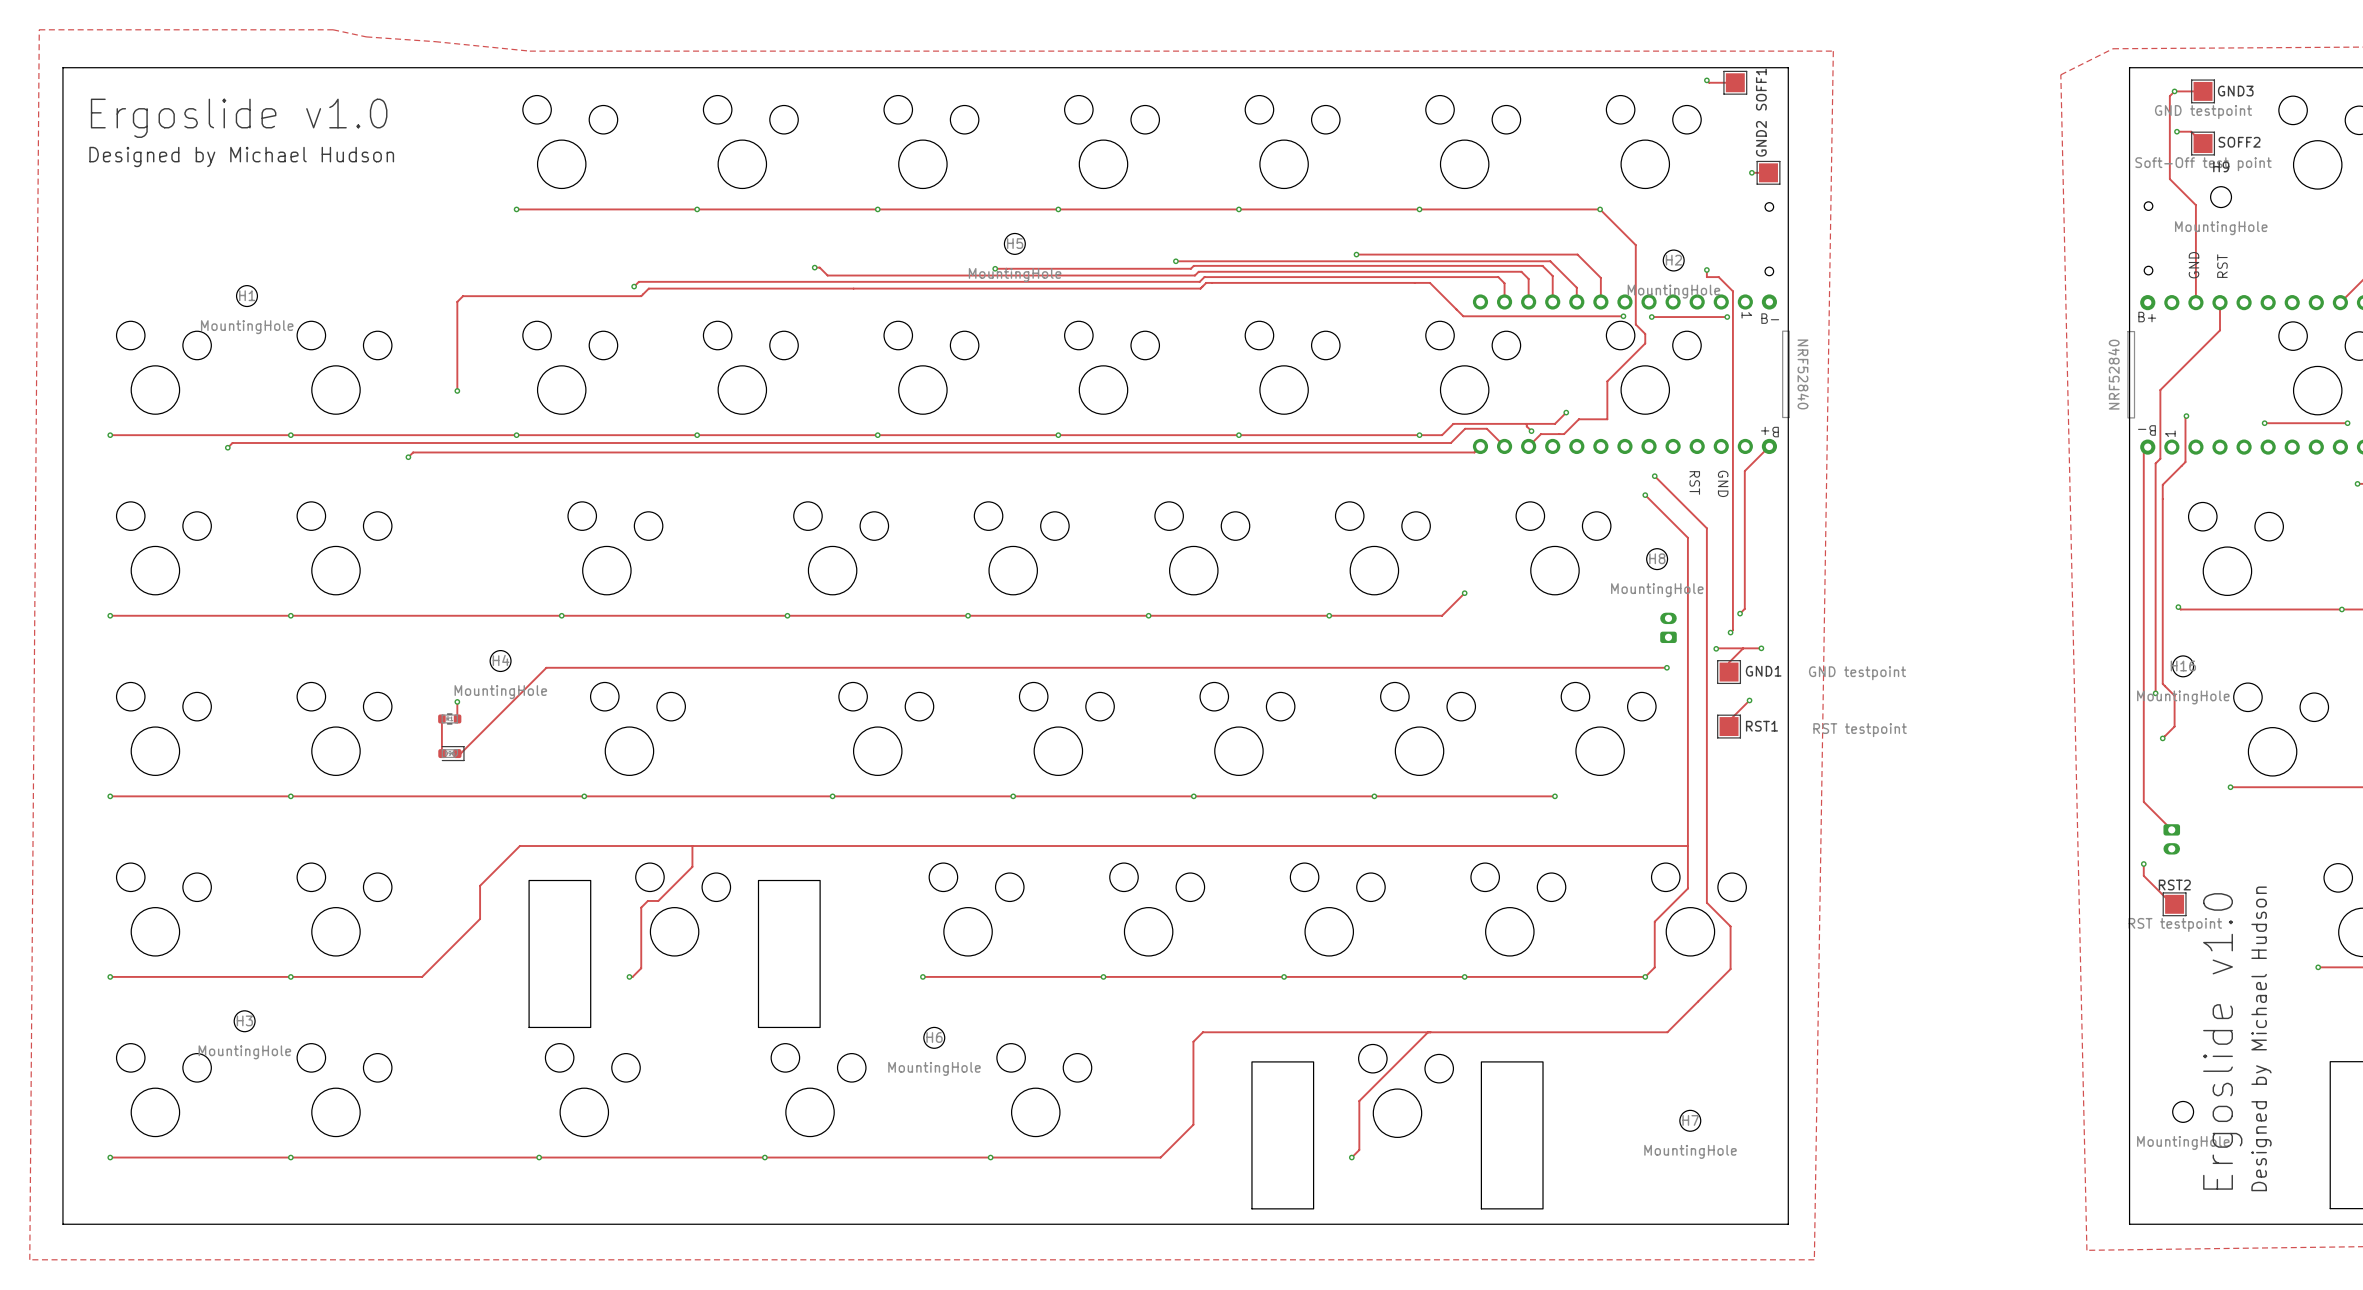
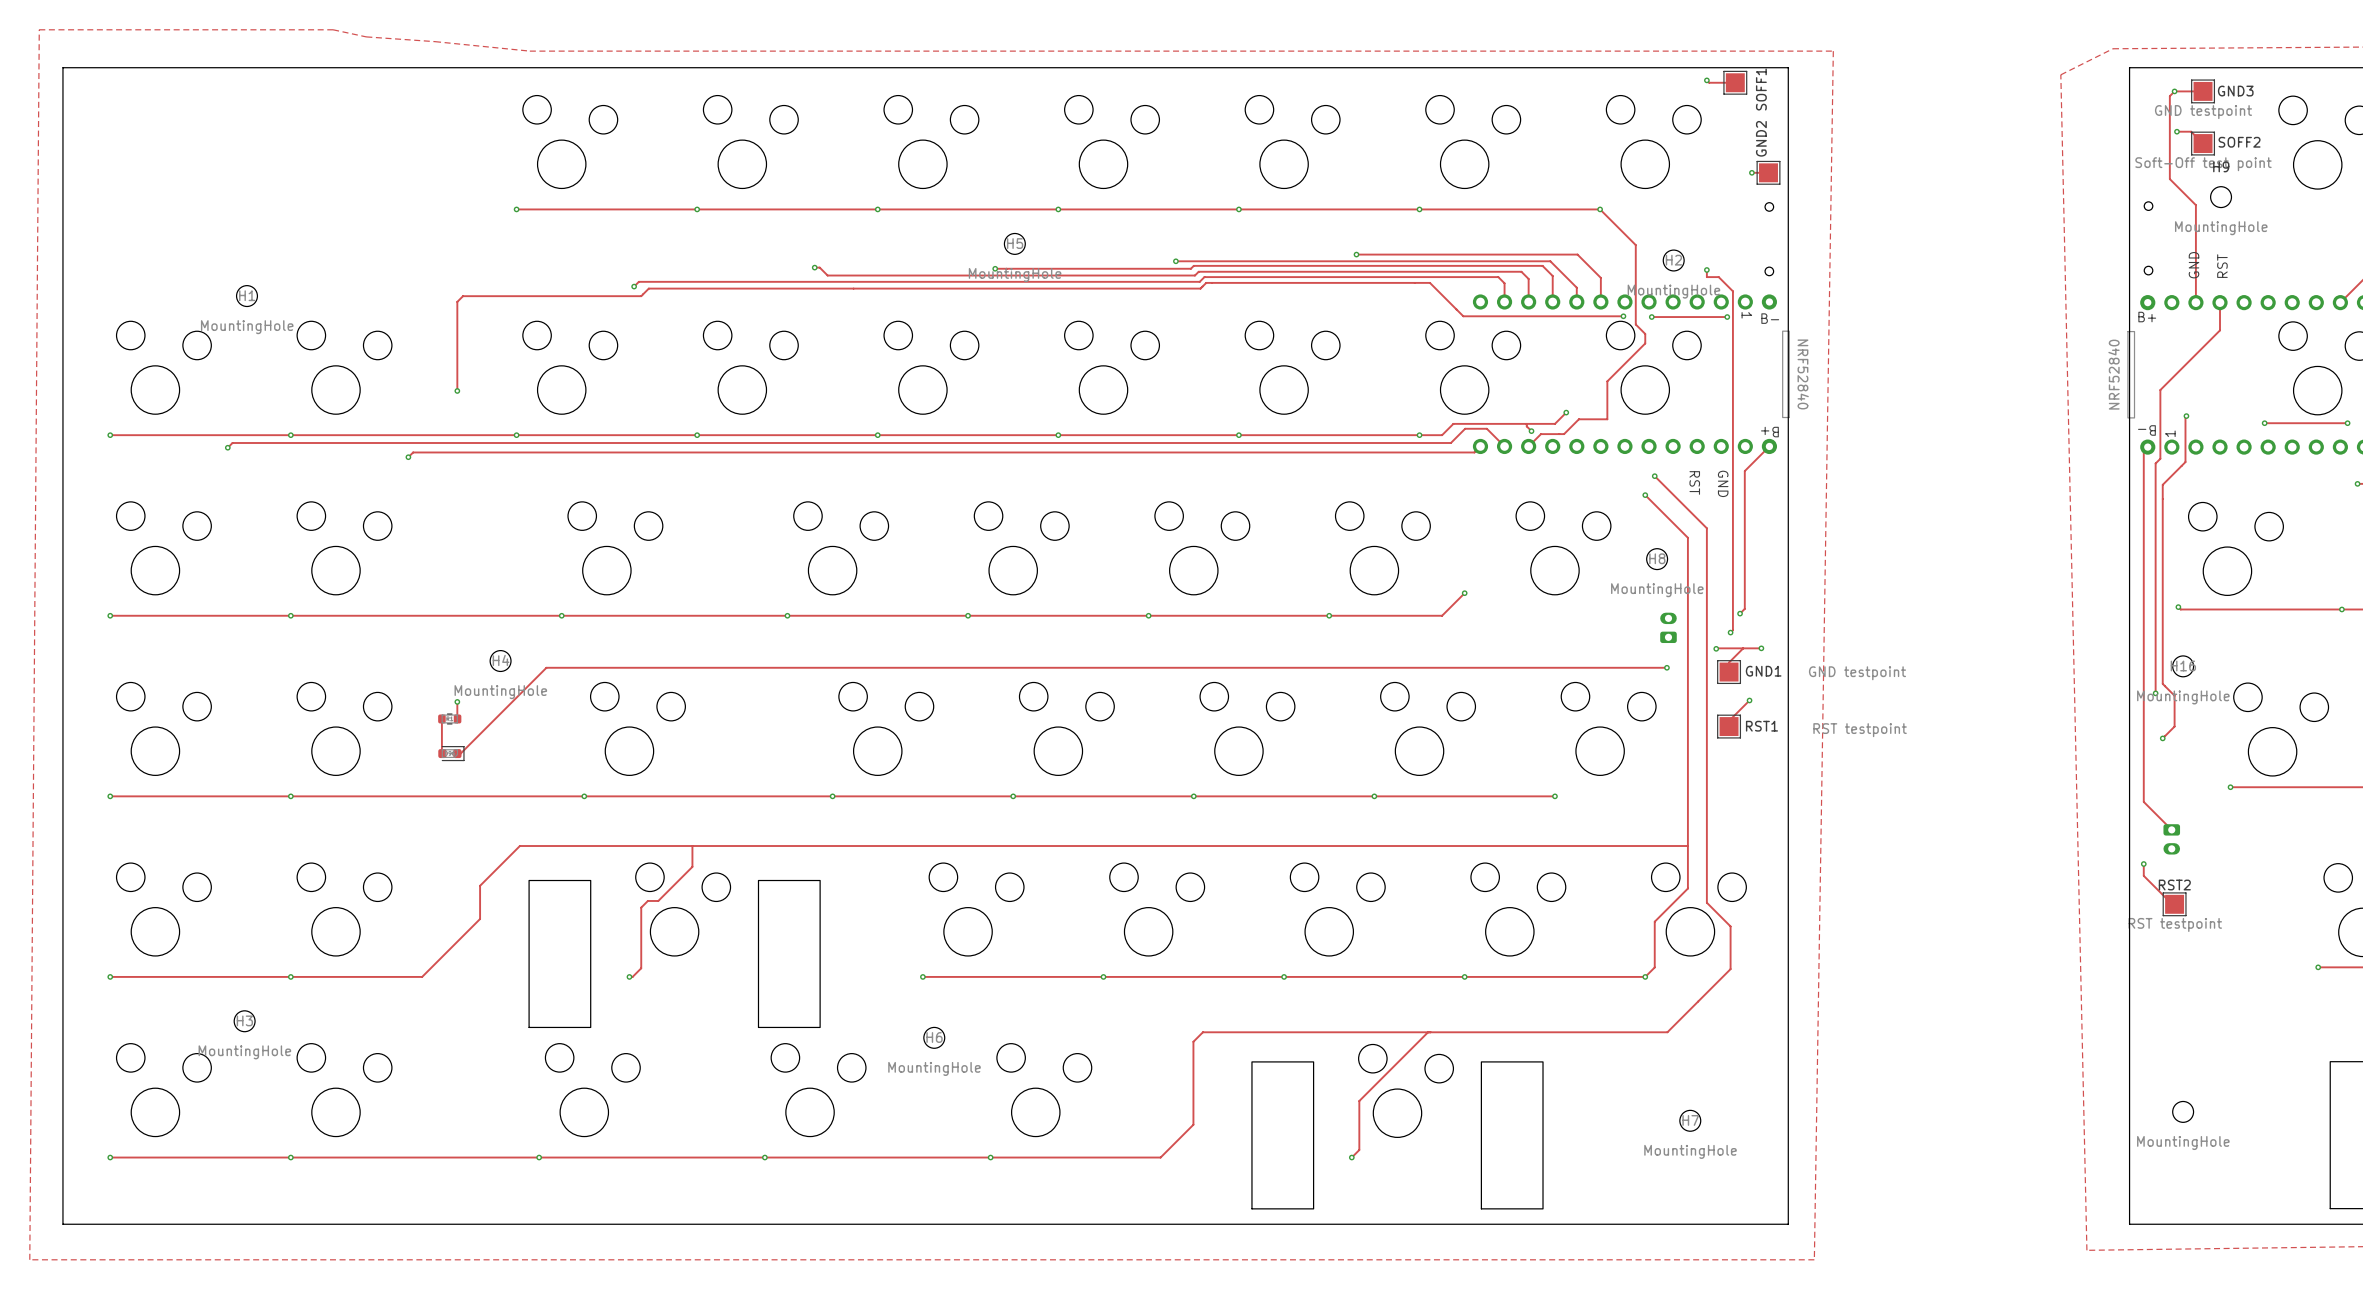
text: Ergoslide v1.0 (239, 118) -> none
text: Designed by Michael Hudson (241, 156) -> none
text: Designed by Michael Hudson (2261, 1038) -> none
text: Ergoslide v1.0 (2222, 1041) -> none

